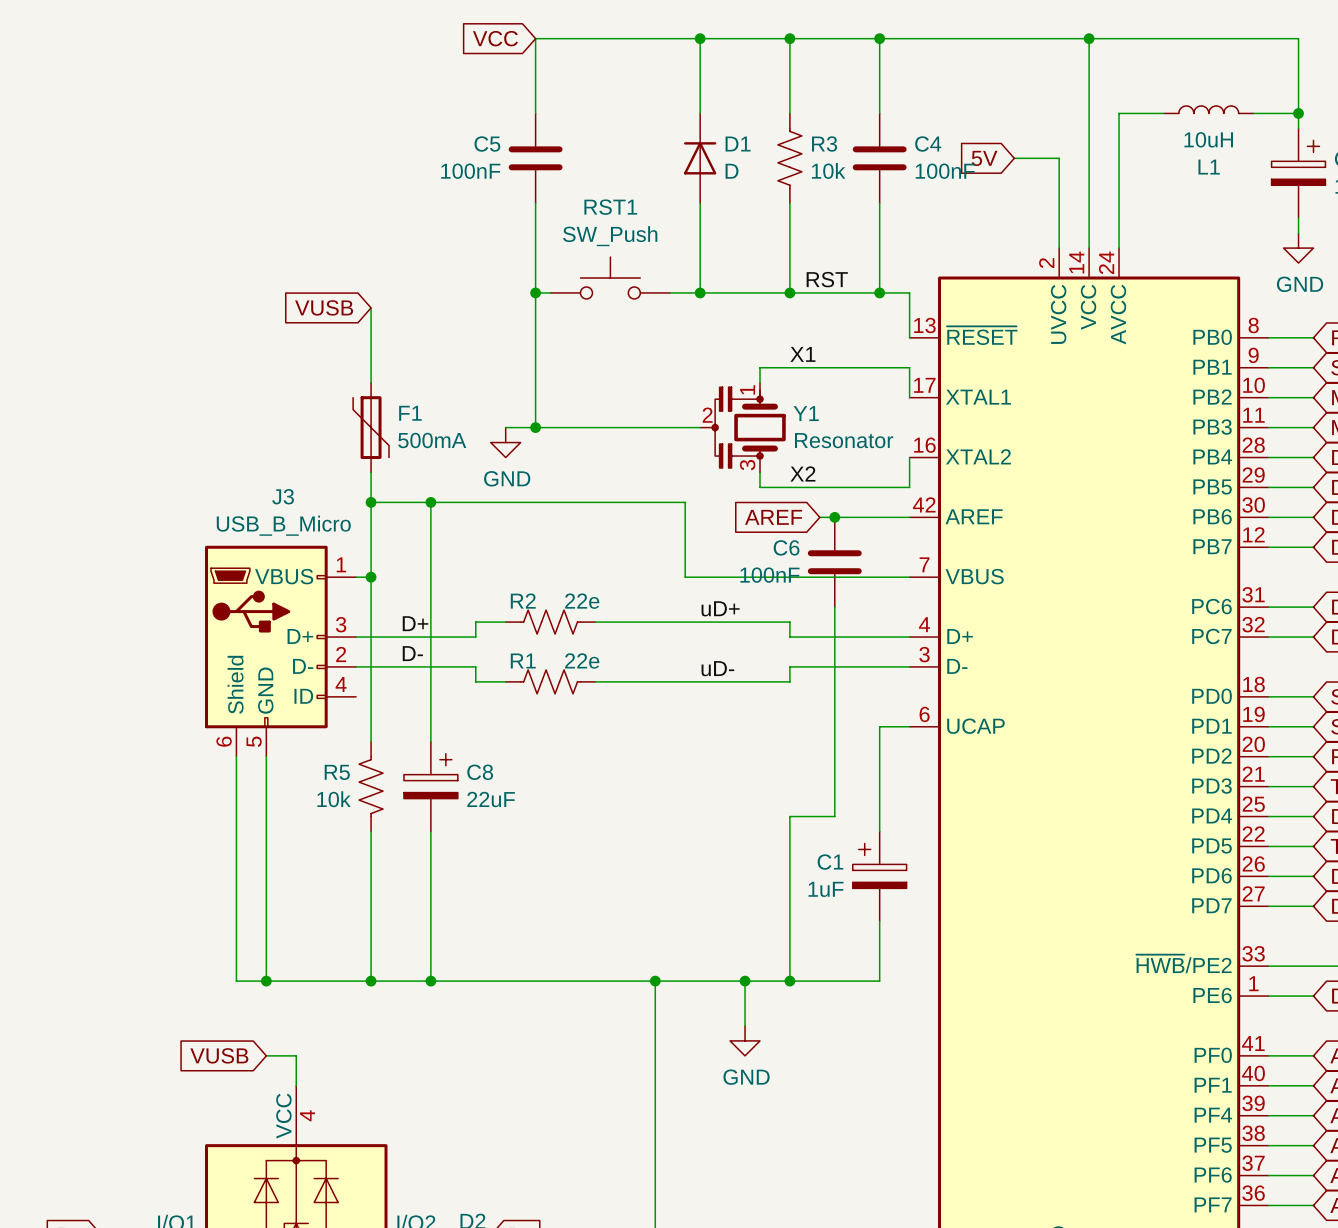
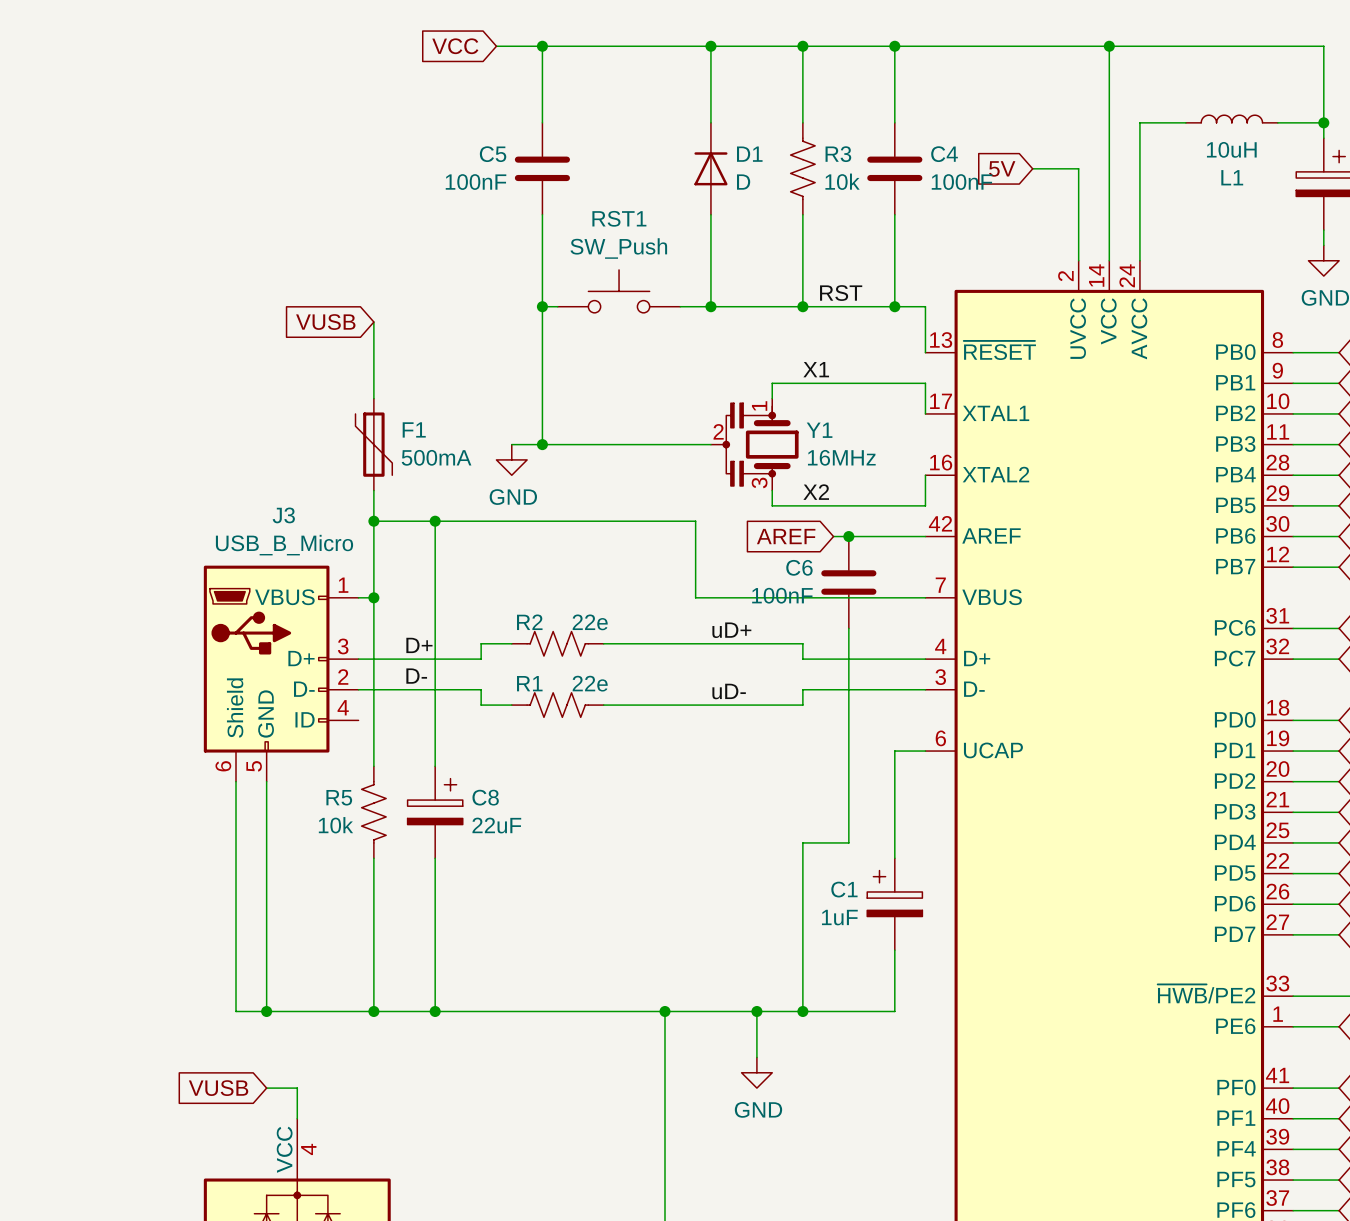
wire: none -> (496, 46) (542, 46)
global label position: VCC (495, 38) -> VCC (455, 46)
junction: none -> (542, 46)
Y1 value: Resonator (844, 440) -> 16MHz (841, 457)

